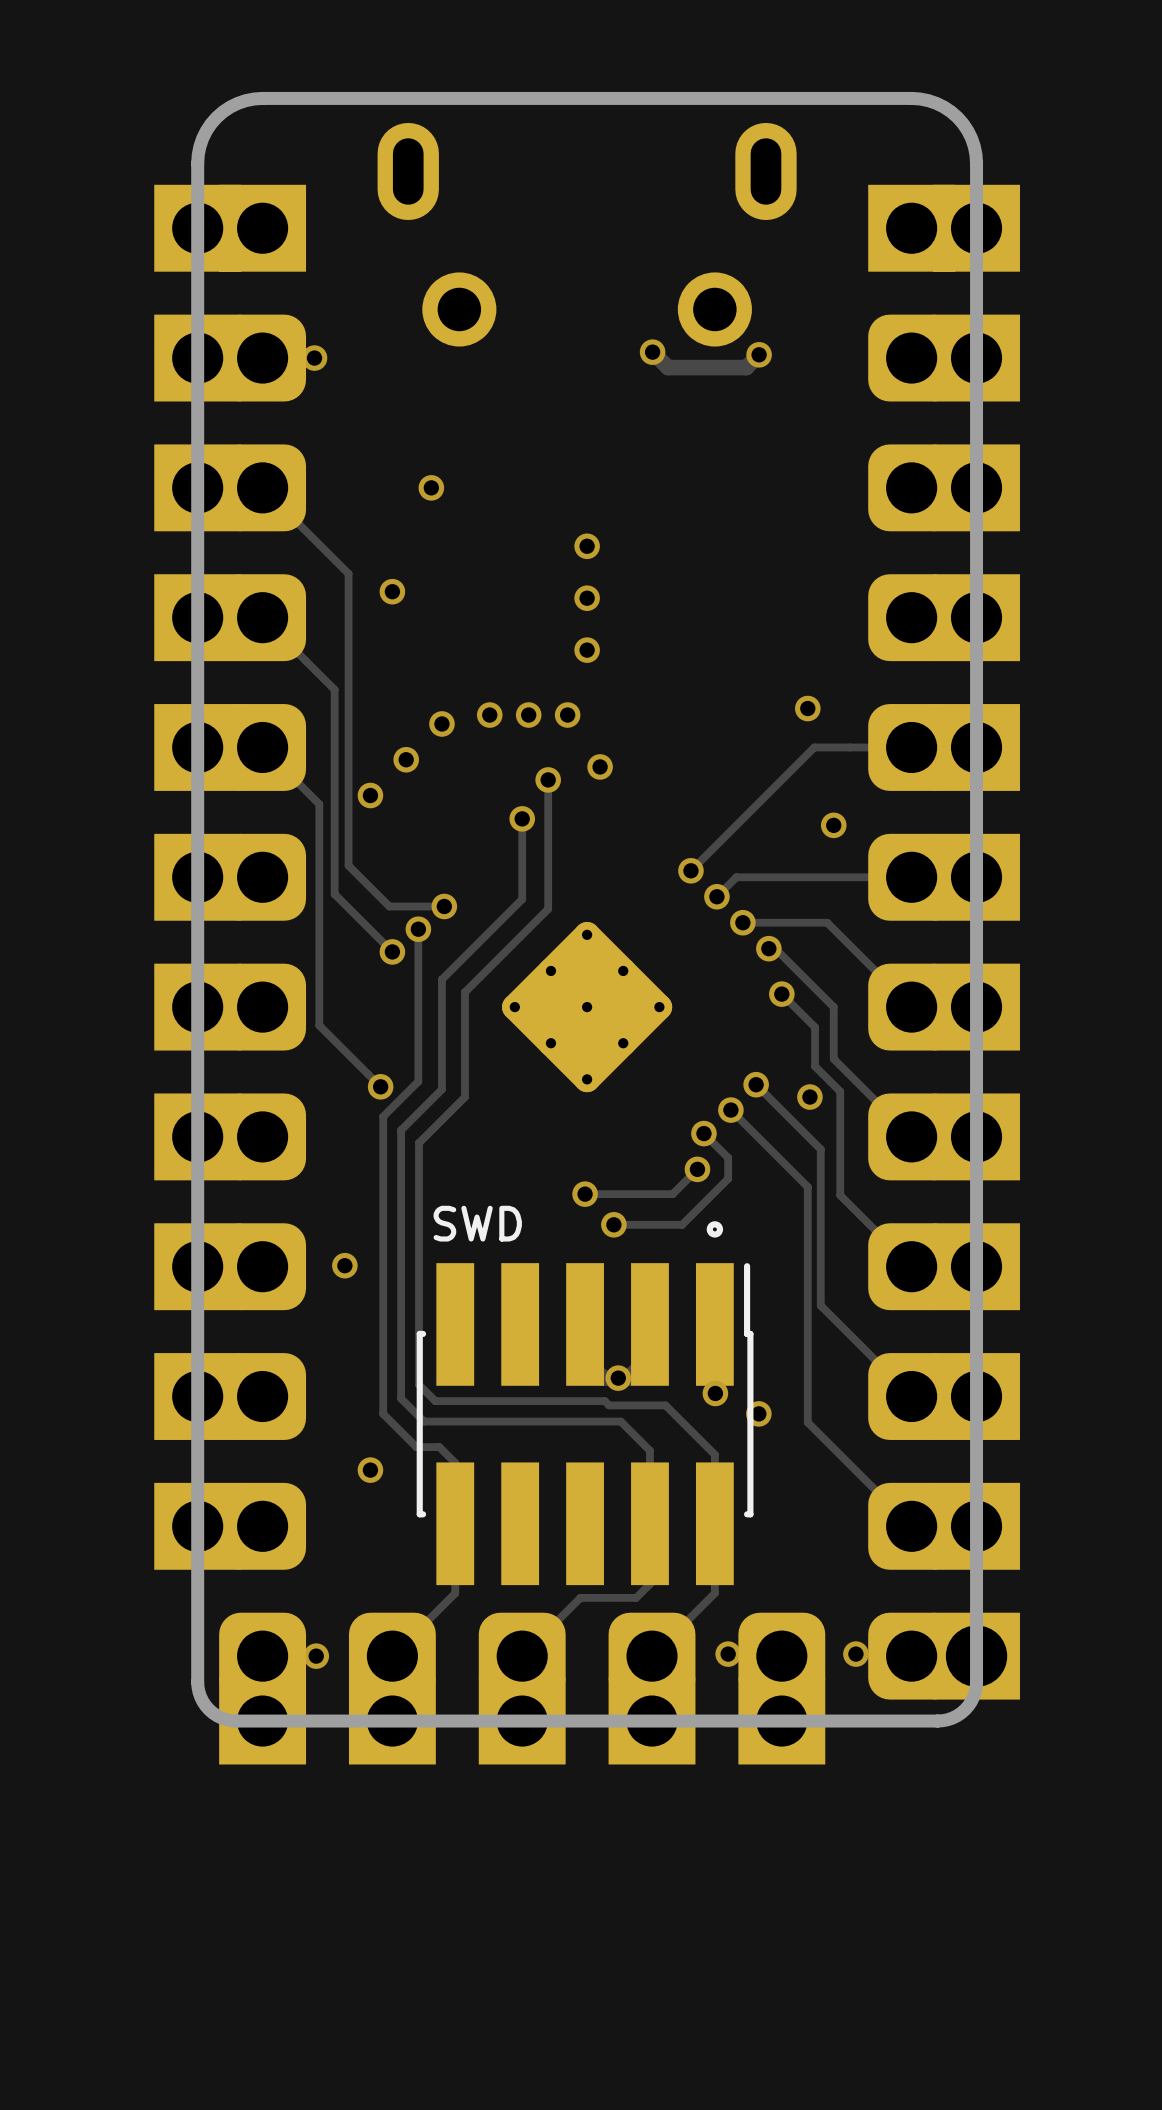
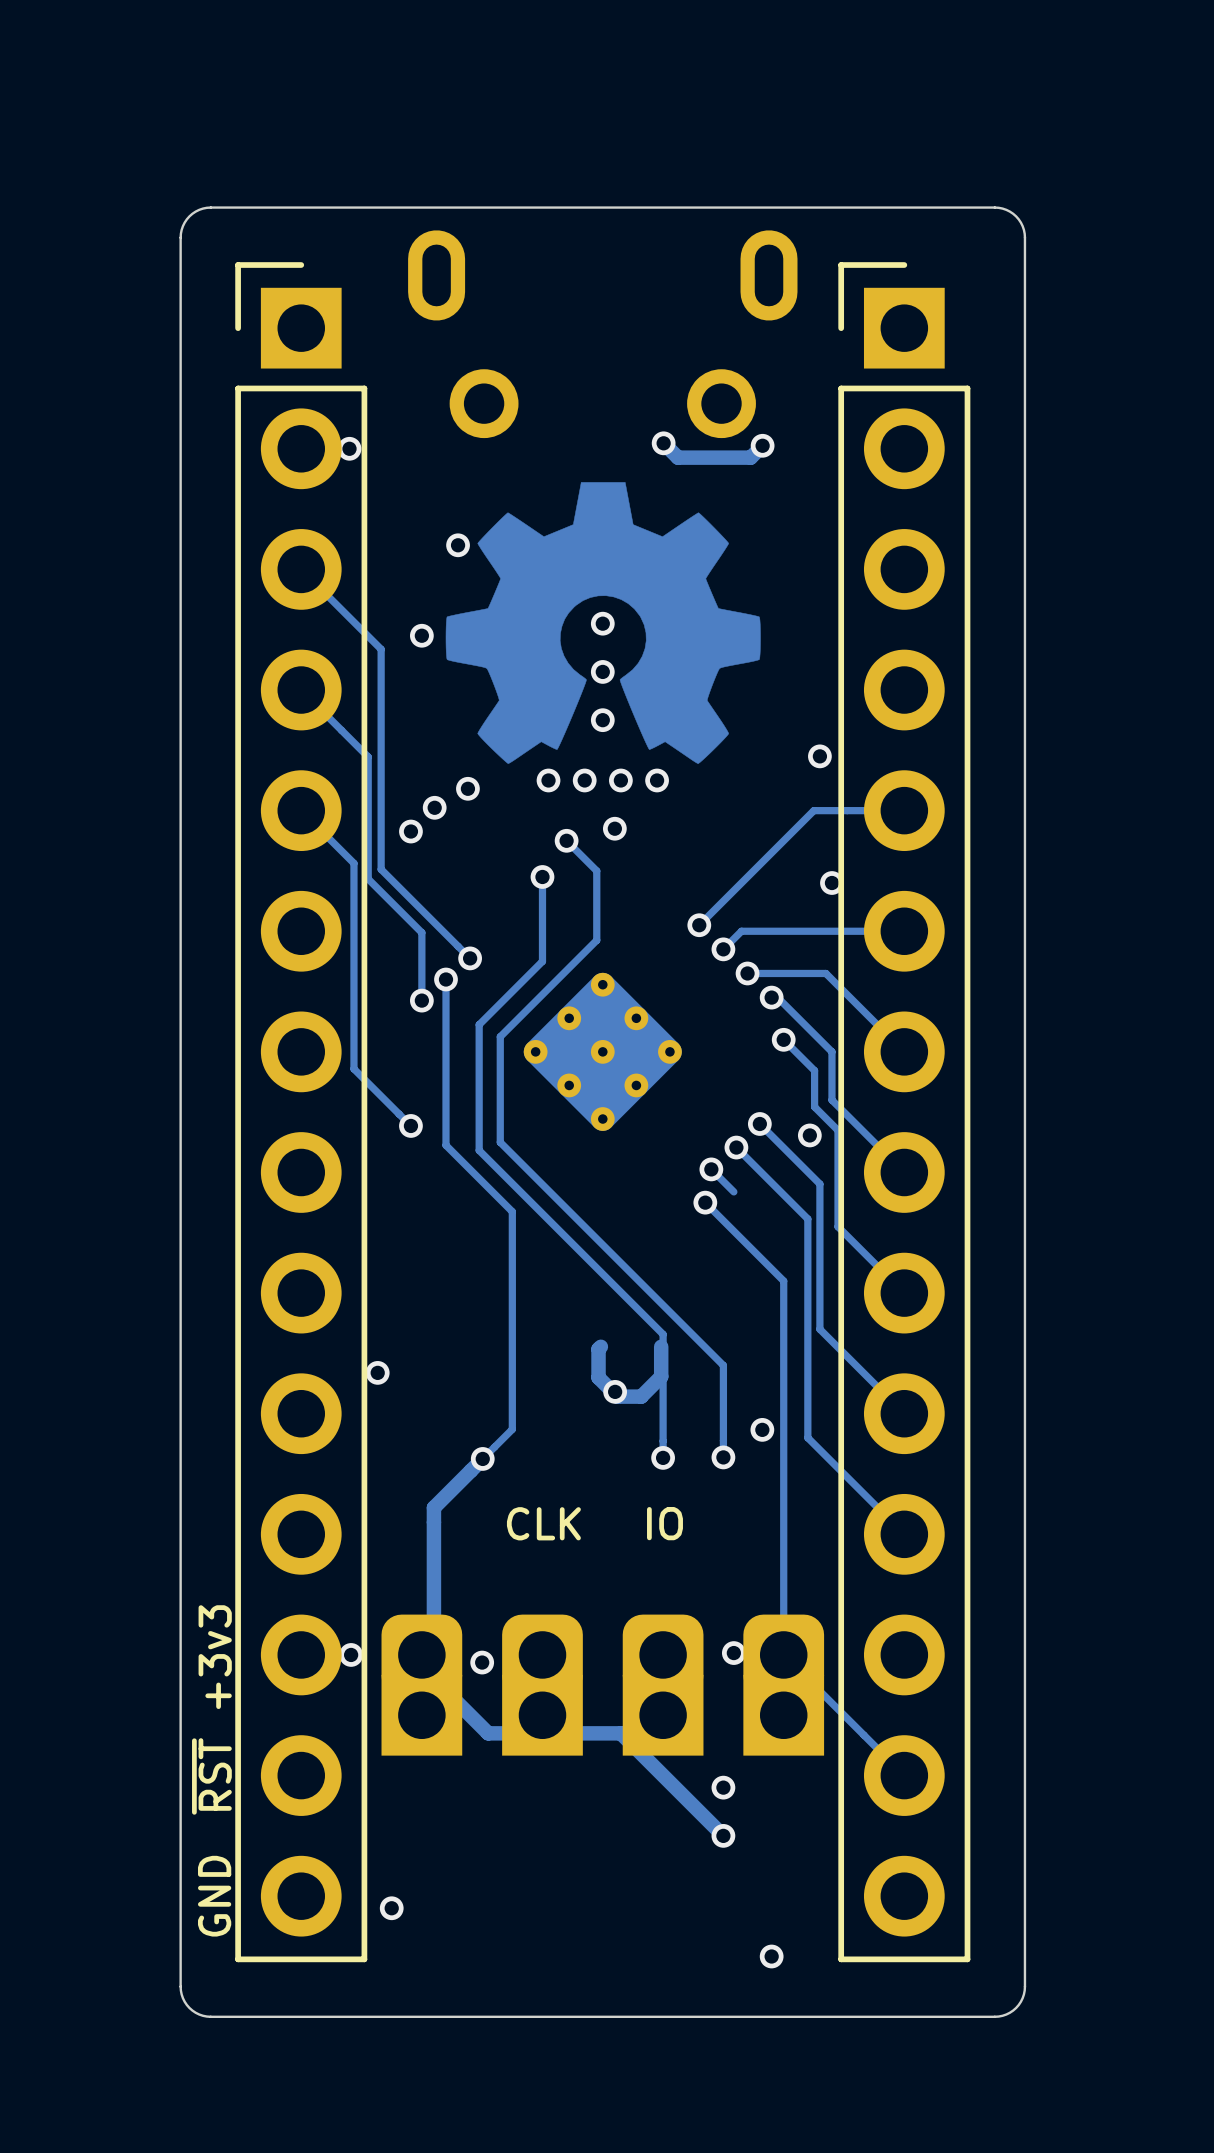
board edge: (911, 98) (936, 103) (957, 117) (971, 138) (976, 163) (976, 1682) (973, 1697) (961, 1712) (947, 1719) (937, 1721) (236, 1721) (221, 1718) (209, 1709) (200, 1697) (197, 1682) (197, 163) (202, 138) (216, 117) (237, 103) (262, 98) -> (904, 207) (1002, 208) (1016, 216) (1020, 222) (1024, 233) (1024, 1986) (1022, 1998) (1016, 2007) (1009, 2012) (994, 2016) (210, 2016) (199, 2014) (189, 2007) (182, 1998) (180, 1986) (180, 237) (181, 229) (186, 219) (192, 213) (202, 208) (301, 207)
board edge width: thick (911, 98) (262, 98) -> thin (904, 207) (301, 207)
drawing: none -> [445, 482, 761, 764]
via position: (431, 487) -> (458, 545)
via position: (392, 591) -> (421, 635)
via position: (807, 708) -> (819, 756)
via: (489, 715) -> none
via: none -> (620, 780)
via: none -> (657, 780)
via: none -> (434, 807)
via: (406, 759) -> none
via: none -> (410, 831)
track: (548, 779) (548, 909) (464, 992) (464, 1097) (418, 1143) (418, 1384) (435, 1401) (604, 1401) (609, 1405) (665, 1405) (714, 1454) (714, 1593) (652, 1656) -> (566, 840) (596, 870) (596, 940) (500, 1036) (500, 1142) (723, 1365) (723, 1457)
via: (370, 795) -> none
track: (348, 810) (348, 865) (389, 906) (444, 906) -> (381, 869) (470, 958)
track: (334, 821) (334, 894) (392, 951) -> (368, 879) (421, 932) (421, 1000)
track: (522, 899) (441, 979) (441, 1089) (401, 1130) (401, 1398) (424, 1421) (620, 1421) (649, 1450) (649, 1584) (636, 1597) (580, 1597) (522, 1656) -> (542, 951) (542, 961) (479, 1024) (479, 1150) (663, 1334) (663, 1457)
part: (944, 942) -> none
part: (230, 974) -> none
part: none -> (301, 1112)
part: none -> (904, 1112)
track: (418, 1081) (383, 1116) (383, 1413) (416, 1447) (439, 1447) (455, 1462) (455, 1593) (392, 1656) -> (445, 1120) (445, 1145) (512, 1211) (512, 1429) (433, 1507) (433, 1679) (488, 1733) (620, 1733) (723, 1835)
track: (728, 1157) (728, 1178) (682, 1224) (613, 1224) -> none
track: (697, 1169) (672, 1194) (585, 1194) -> (705, 1202) (783, 1281) (783, 1654) (904, 1775)
via: (585, 1194) -> none
text: SWD (477, 1223) -> none
via: (613, 1224) -> none
via: (344, 1265) -> none
via: none -> (377, 1372)
via position: (618, 1378) -> (615, 1391)
via: (715, 1393) -> none
part: (585, 1403) -> none
via: none -> (723, 1457)
via: none -> (663, 1457)
via: none -> (482, 1458)
via: (370, 1470) -> none
text: none -> CLK (543, 1523)
text: none -> IO (664, 1523)
via: (855, 1654) -> none
text: none -> +3v3 (215, 1657)
via: none -> (482, 1662)
text: none -> ~{RST} (211, 1776)
via: none -> (723, 1787)
via: none -> (723, 1835)
text: none -> GND (214, 1896)
via: none -> (391, 1908)
via: none -> (771, 1956)

